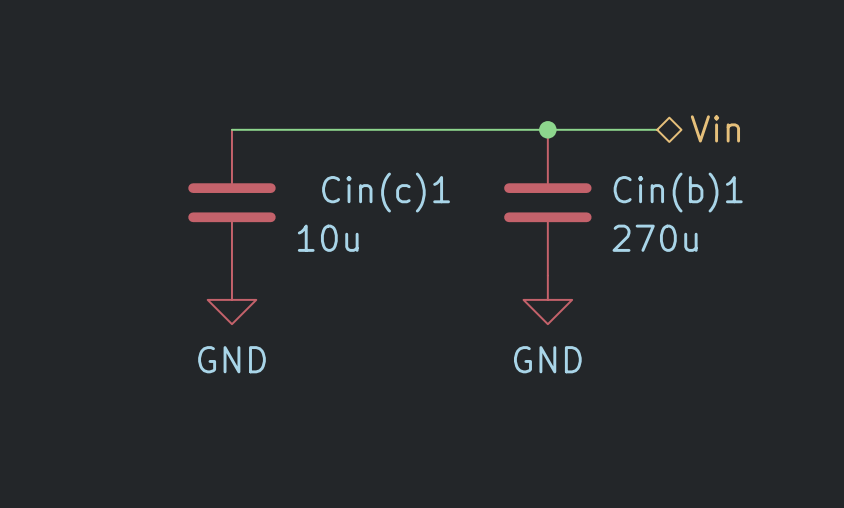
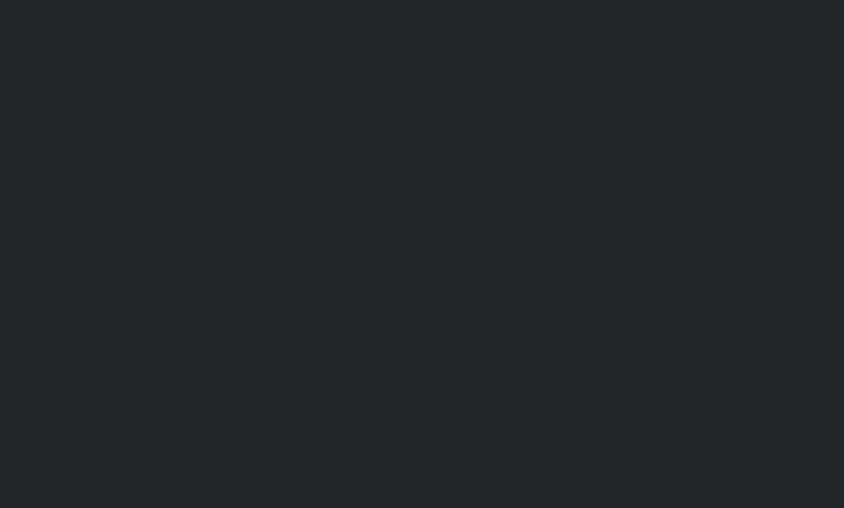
hierarchical label: Vin (715, 128) -> none
wire: (231, 129) (657, 129) -> none
junction: (547, 129) -> none
Cin(c)1: 10u (231, 202) -> none
Cin(b)1: 270u (547, 202) -> none
power symbol: GND (231, 299) -> none
power symbol: GND (547, 299) -> none

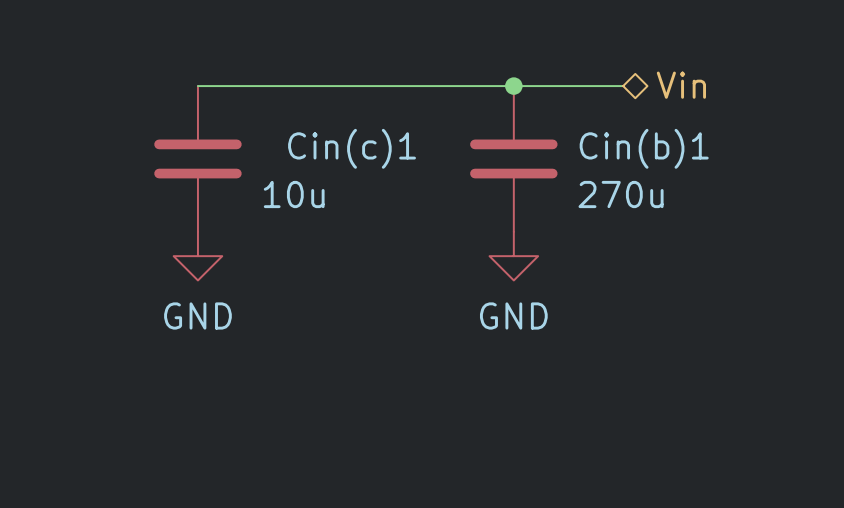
hierarchical label: none -> Vin (681, 85)
wire: none -> (197, 86) (623, 86)
junction: none -> (513, 86)
Cin(c)1: none -> 10u (197, 158)
Cin(b)1: none -> 270u (513, 158)
power symbol: none -> GND (197, 256)
power symbol: none -> GND (513, 256)

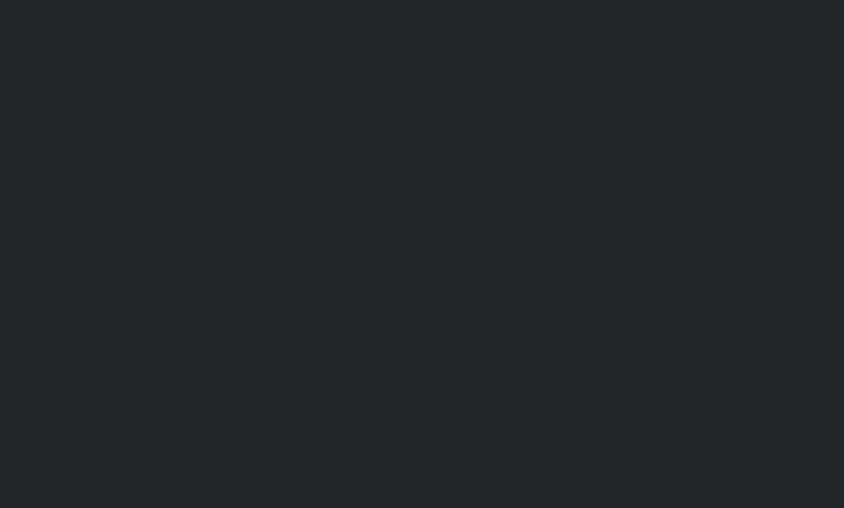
hierarchical label: Vin (681, 85) -> none
wire: (197, 86) (623, 86) -> none
junction: (513, 86) -> none
Cin(c)1: 10u (197, 158) -> none
Cin(b)1: 270u (513, 158) -> none
power symbol: GND (197, 256) -> none
power symbol: GND (513, 256) -> none

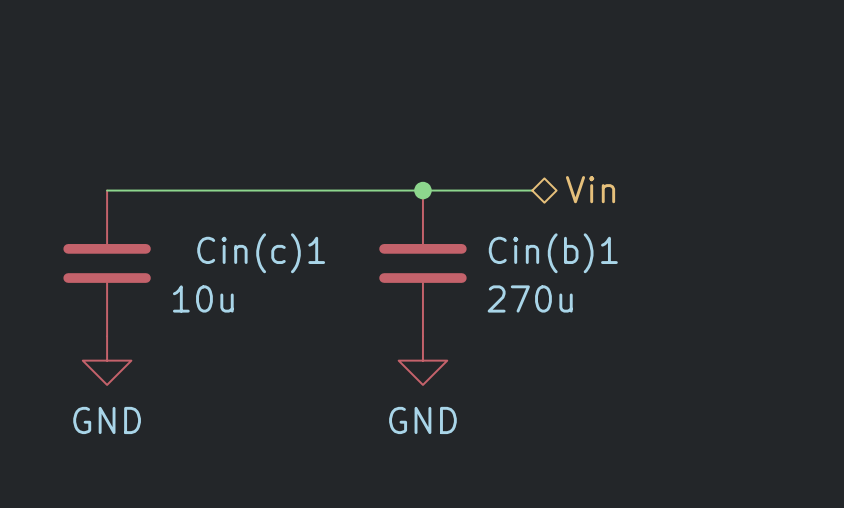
hierarchical label: none -> Vin (590, 189)
wire: none -> (107, 190) (532, 190)
junction: none -> (422, 190)
Cin(c)1: none -> 10u (107, 263)
Cin(b)1: none -> 270u (422, 263)
power symbol: none -> GND (107, 360)
power symbol: none -> GND (422, 360)

